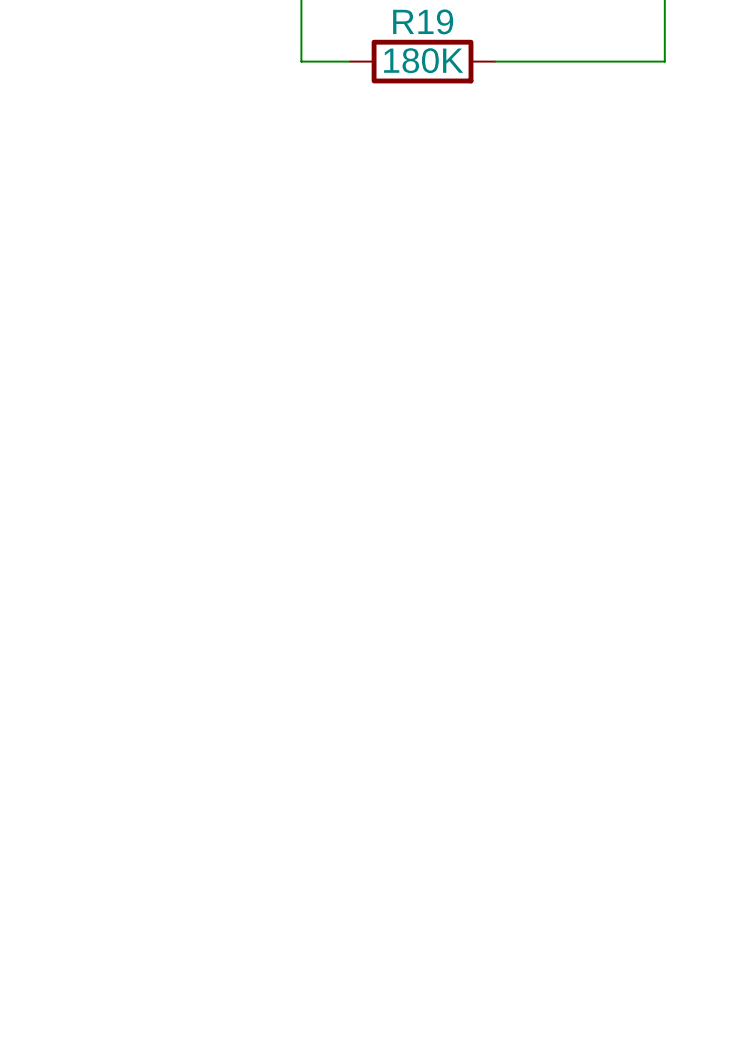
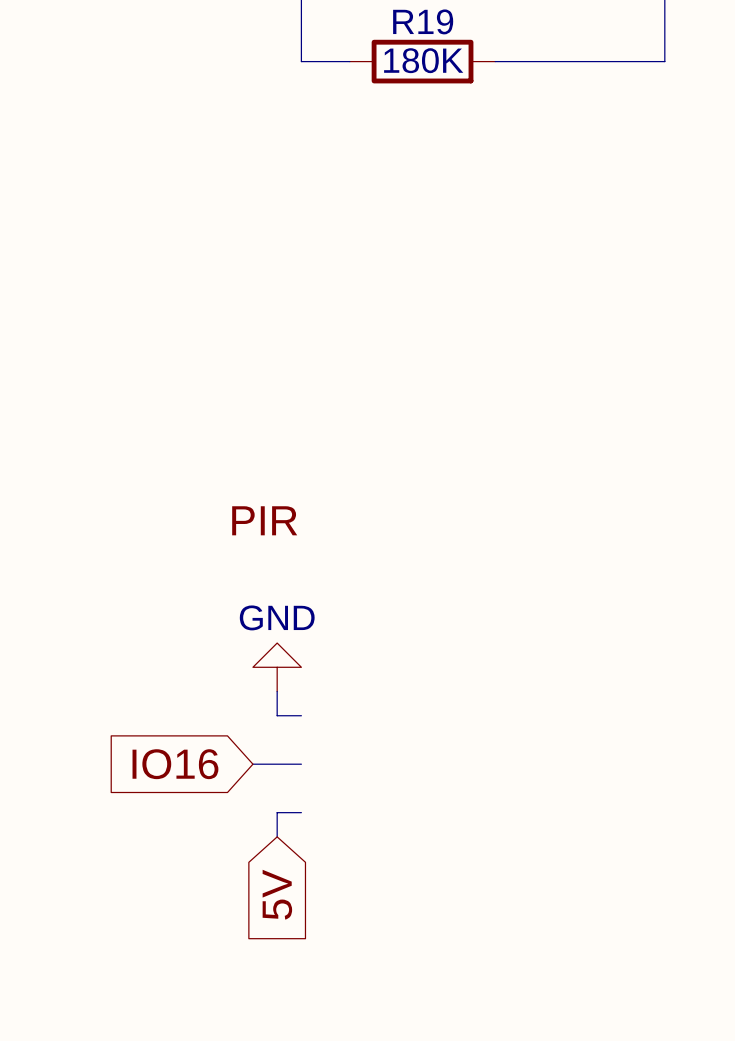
label: none -> PIR (264, 520)
power symbol: none -> GND (277, 667)
wire: none -> (277, 691) (277, 715) (301, 715)
global label: none -> IO16 (175, 764)
wire: none -> (252, 764) (301, 764)
wire: none -> (301, 812) (277, 812) (277, 836)
global label: none -> 5V (277, 894)

